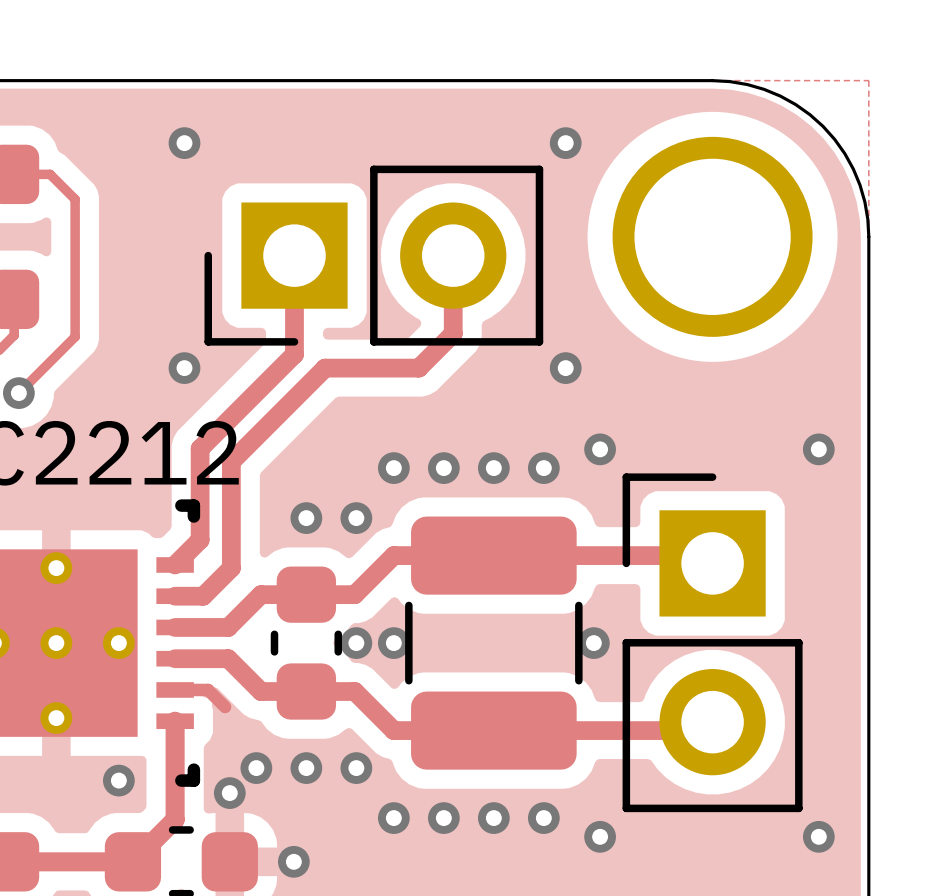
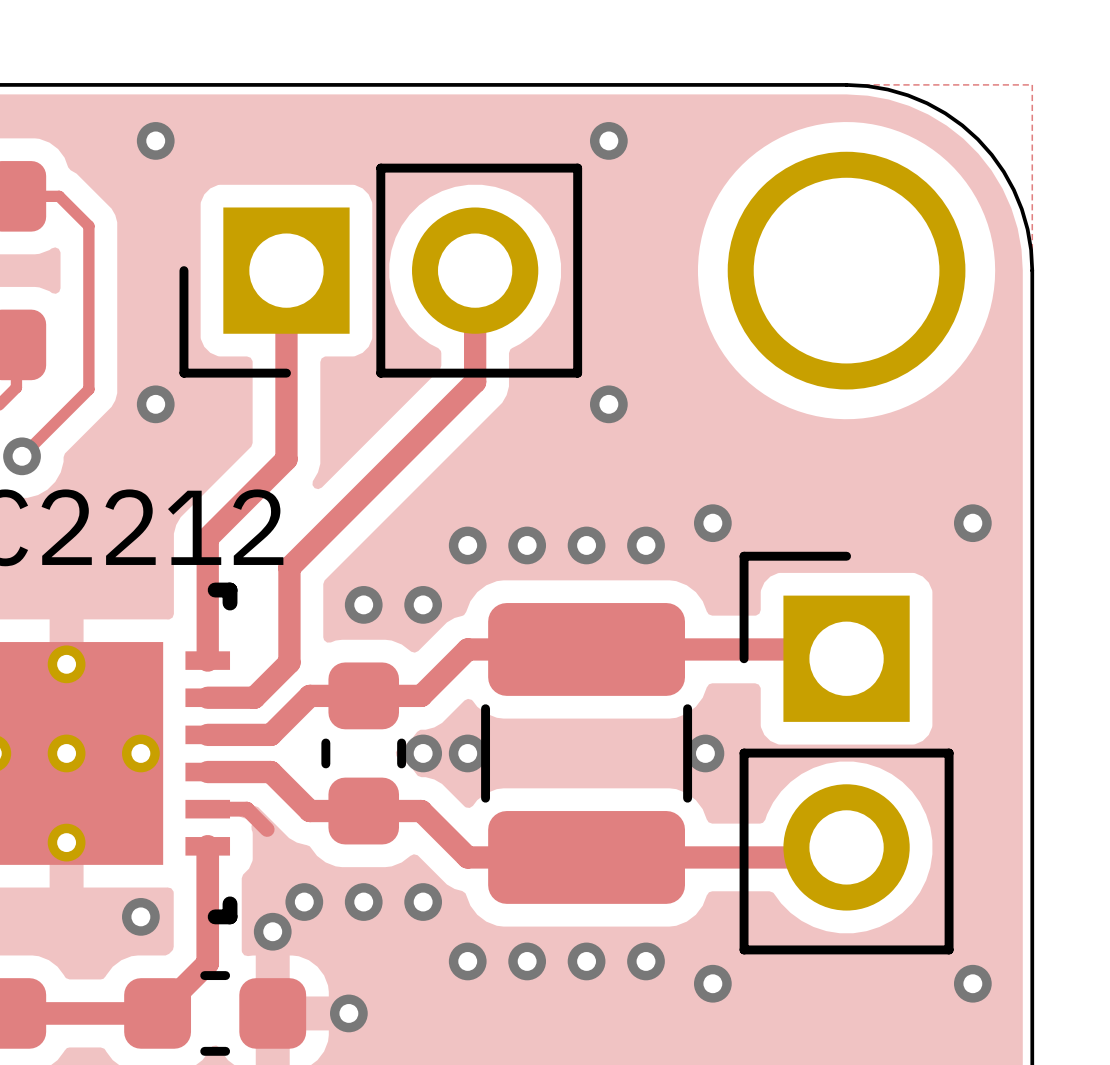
via position: (184, 143) -> (155, 140)
via position: (565, 143) -> (608, 140)
track: (294, 255) (294, 354) (200, 448) (200, 539) (175, 564) -> (286, 270) (286, 459) (207, 538) (207, 660)
part position: (373, 255) -> (380, 270)
track: (453, 255) (453, 333) (418, 368) (325, 368) (231, 461) (231, 568) (203, 596) -> (475, 270) (475, 382) (289, 567) (289, 662) (254, 697) (241, 697)
via position: (184, 368) -> (155, 404)
via position: (565, 368) -> (608, 404)

